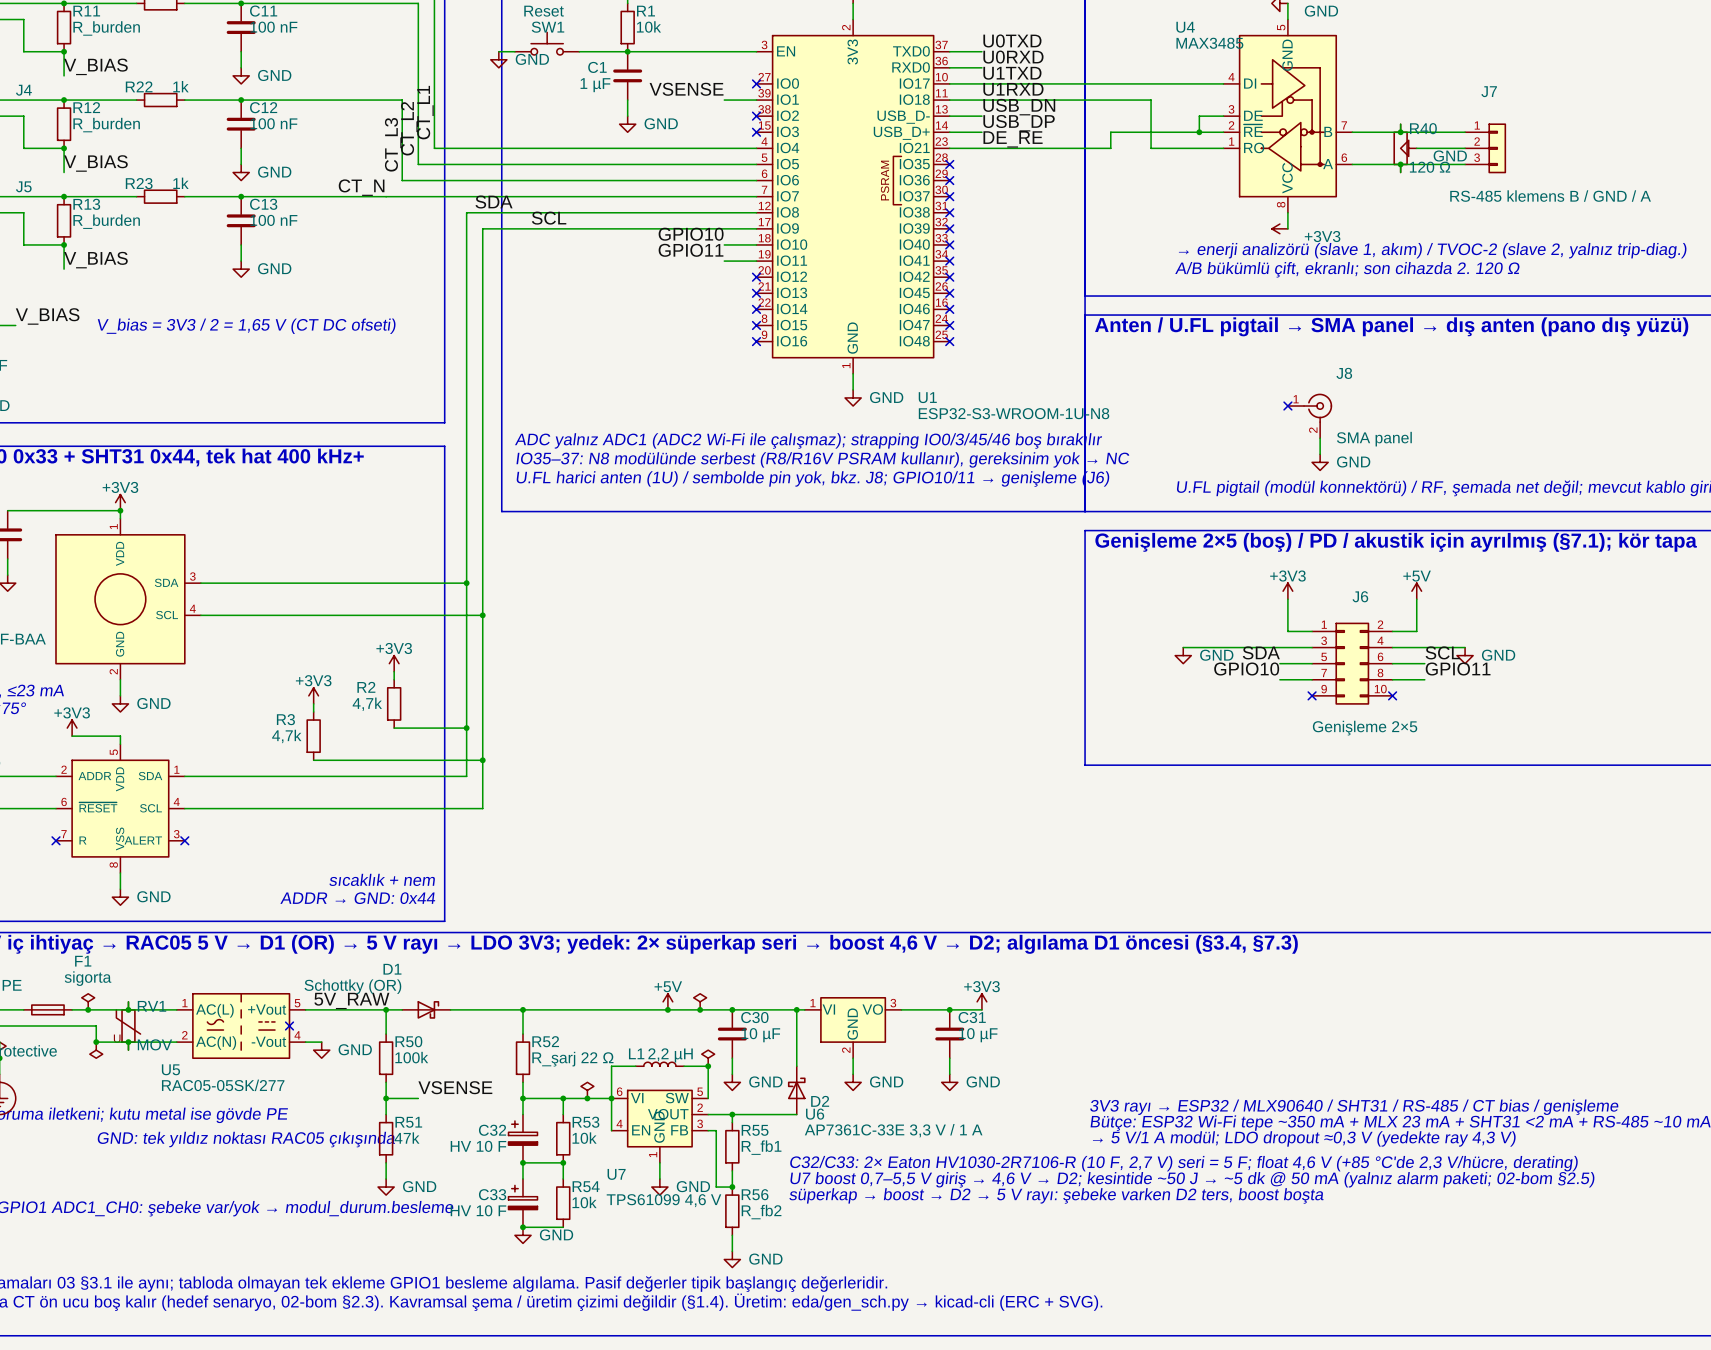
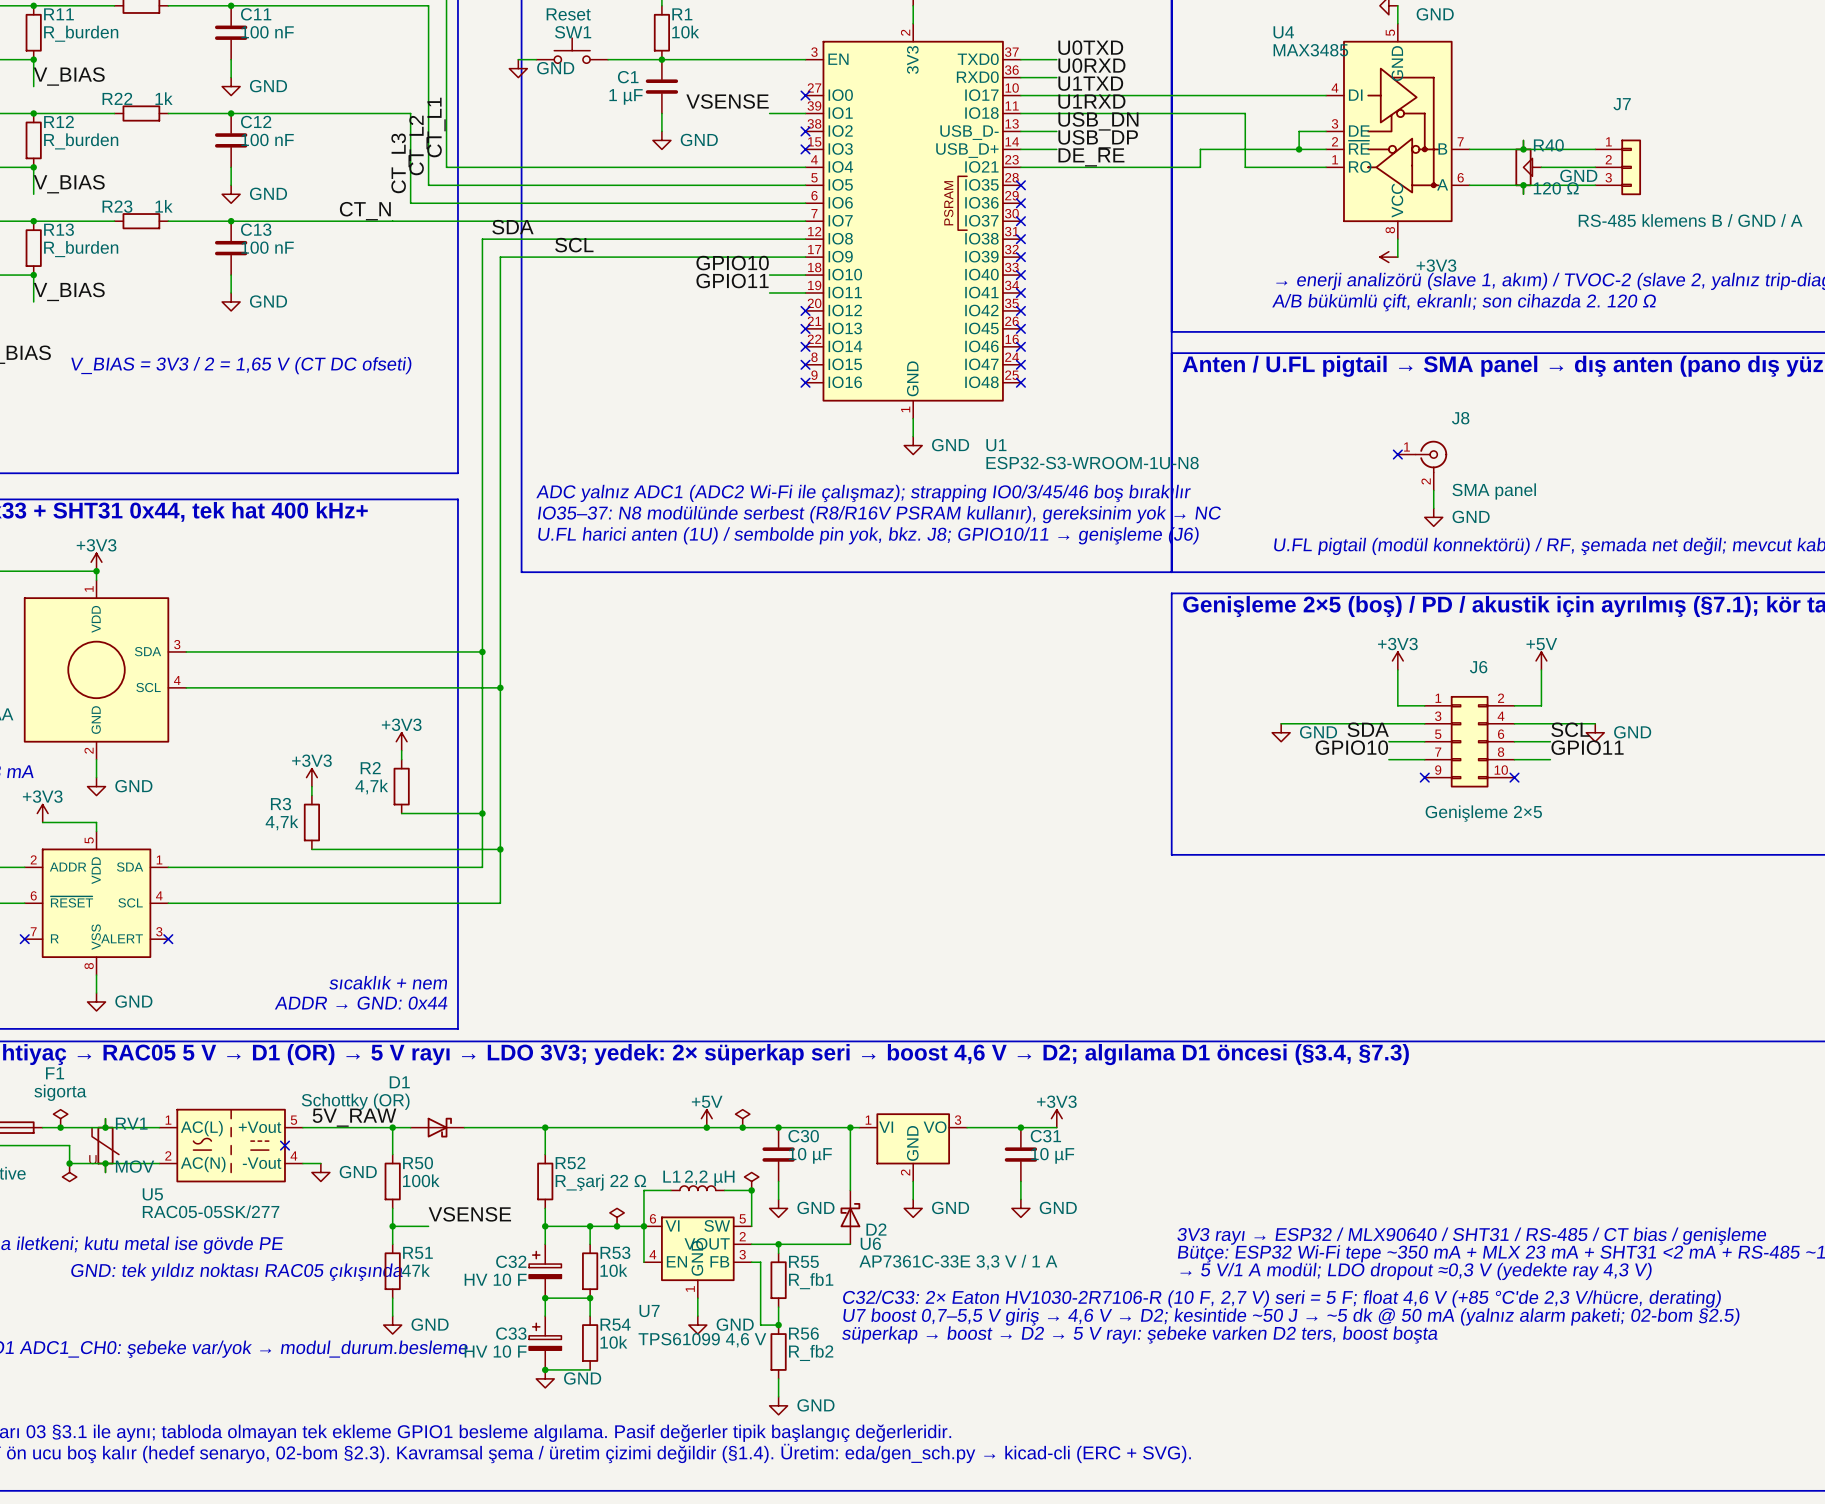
text: V_bias = 3V3 / 2 = 1,65 V (CT DC ofseti) (246, 326) -> V_BIAS = 3V3 / 2 = 1,65 V (CT DC ofseti) (241, 365)

